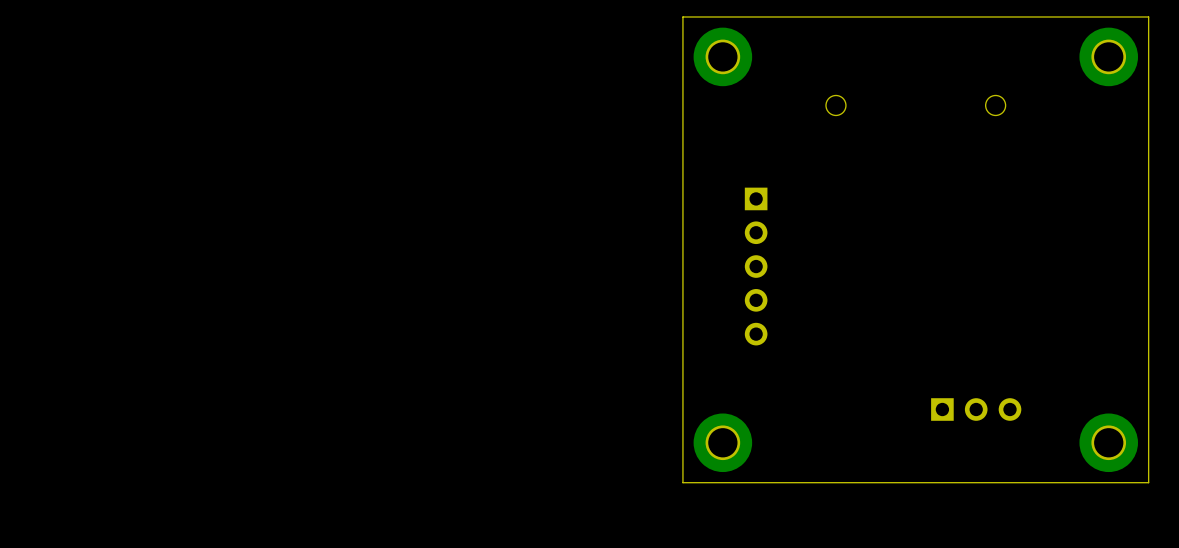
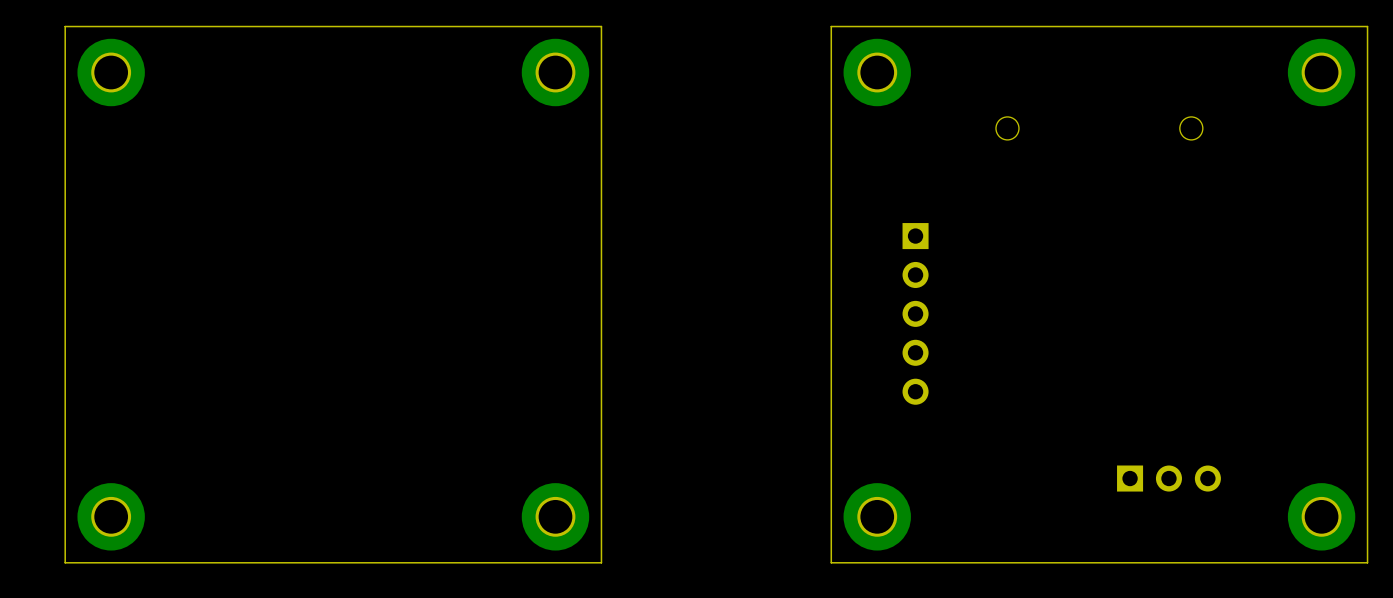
board edge: none -> (601, 26) (65, 26) (65, 562) (601, 562) (601, 26)
part: none -> (111, 72)
part: none -> (555, 72)
part: none -> (111, 516)
part: none -> (555, 516)

